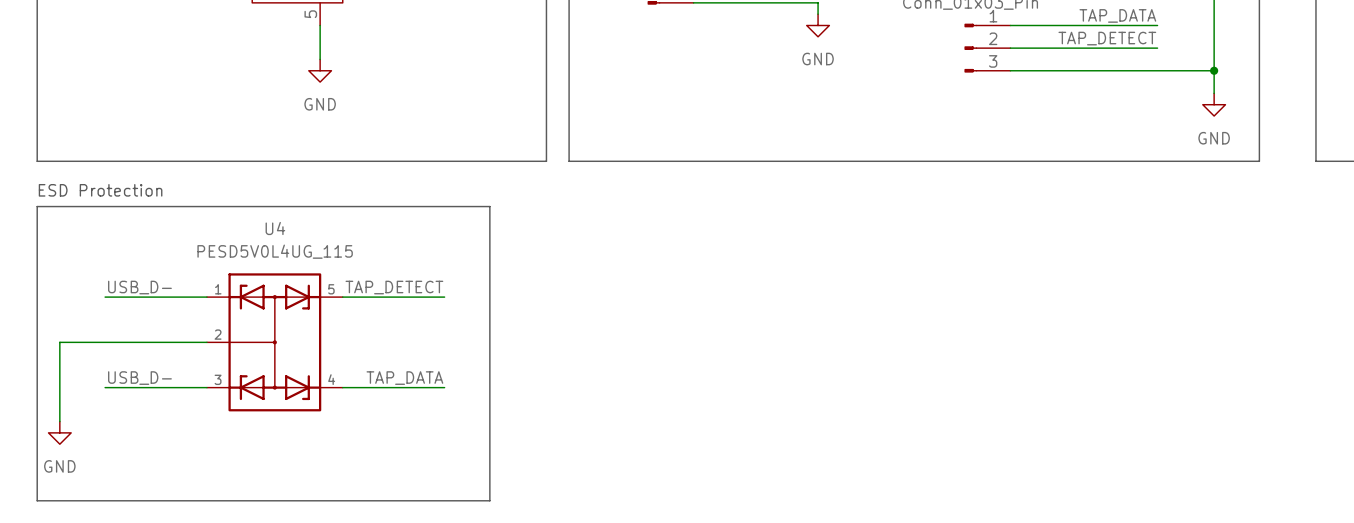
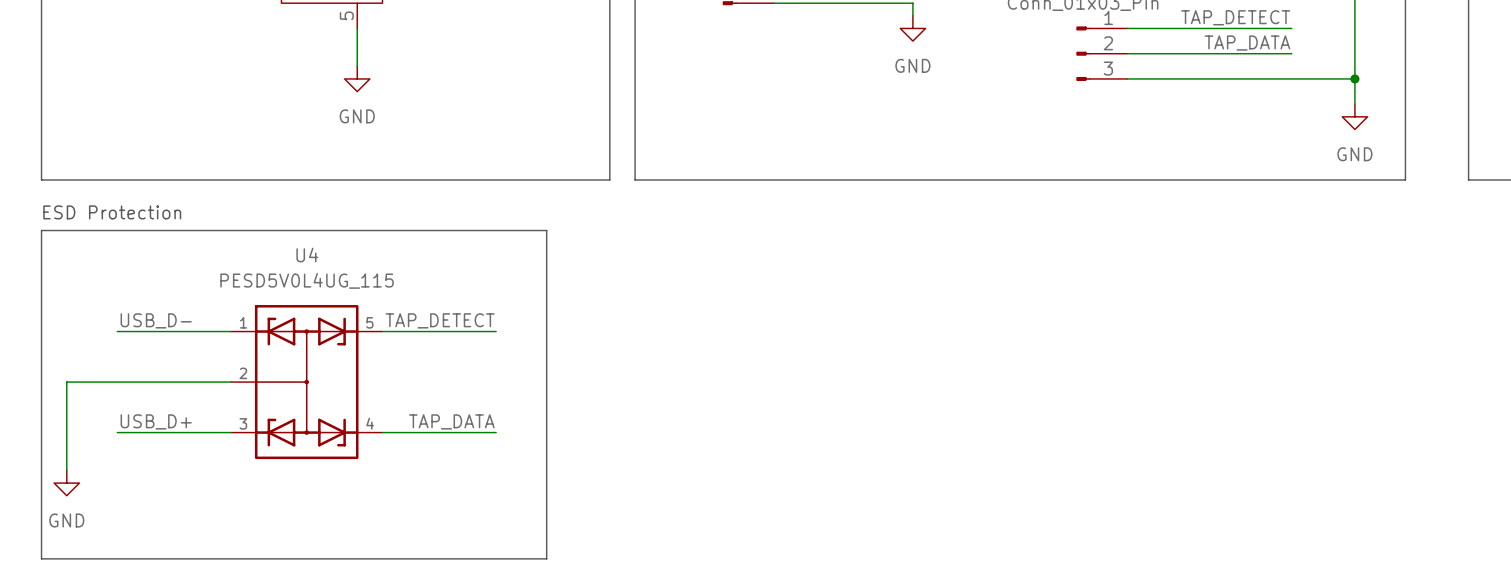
label: TAP_DATA (1117, 15) -> TAP_DETECT (1235, 17)
label: TAP_DETECT (1107, 38) -> TAP_DATA (1247, 43)
label: USB_D- (139, 378) -> USB_D+ (156, 421)

